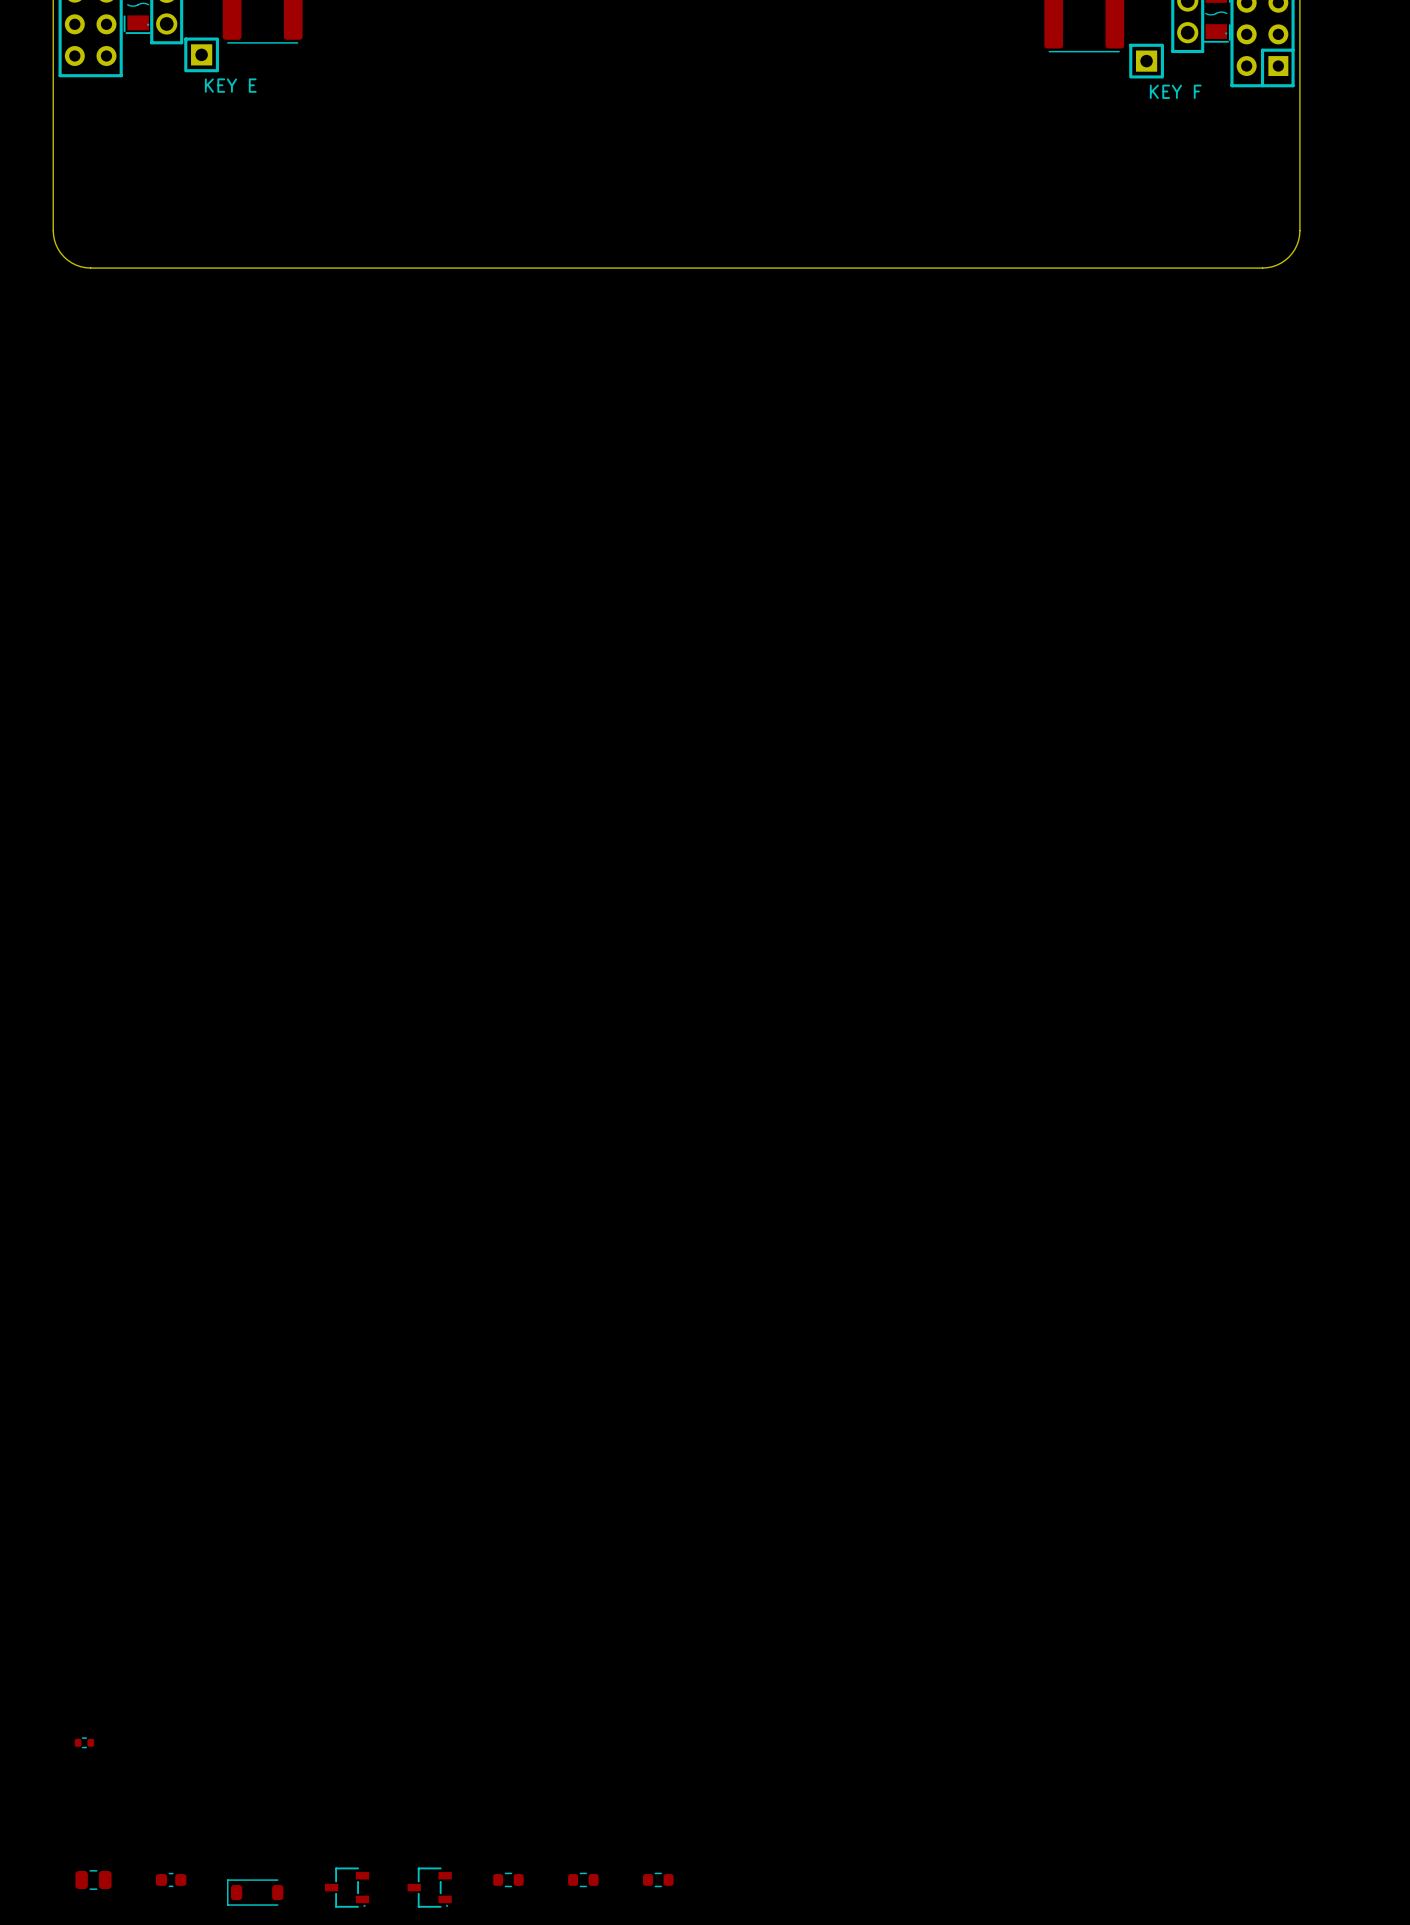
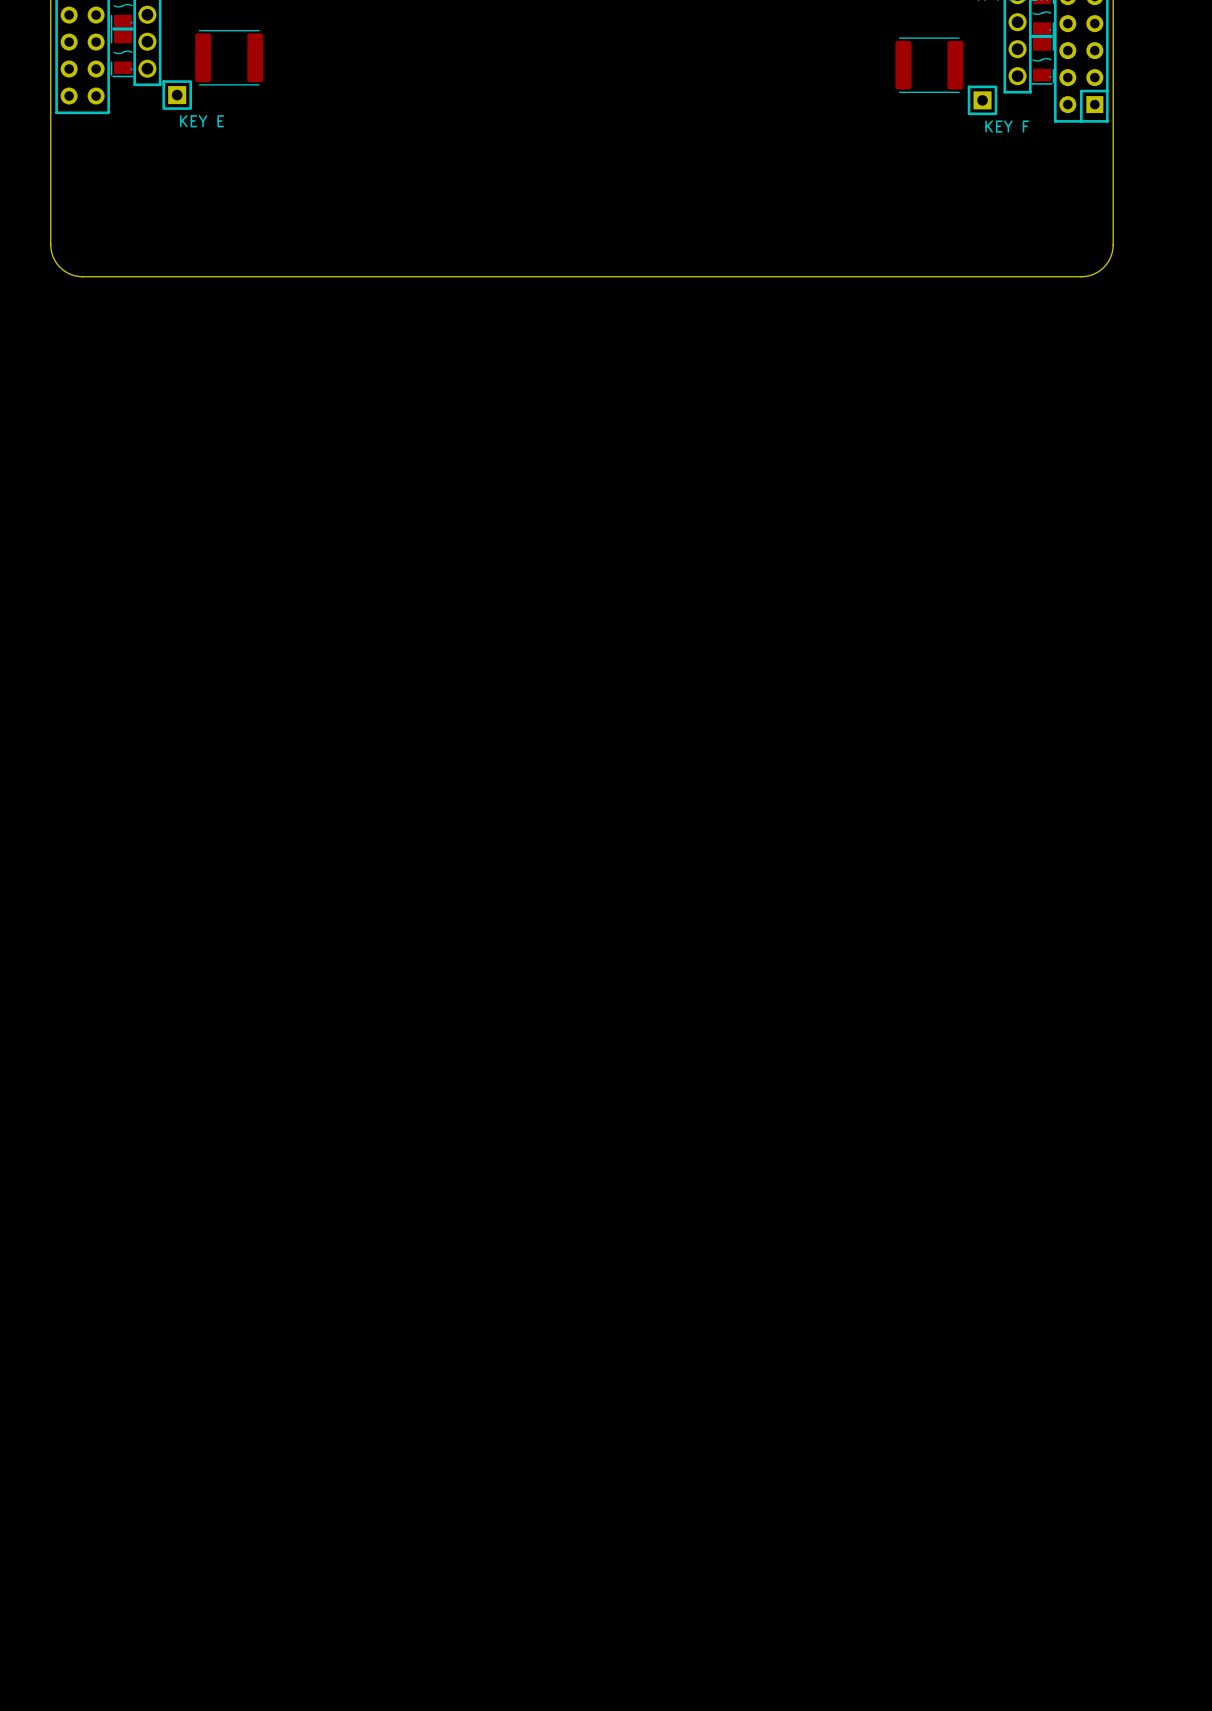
part: (84, 1742) -> none
part: (171, 1879) -> none
part: (508, 1879) -> none
part: (583, 1879) -> none
part: (658, 1879) -> none
part: (93, 1880) -> none
part: (347, 1887) -> none
part: (429, 1887) -> none
part: (255, 1892) -> none

